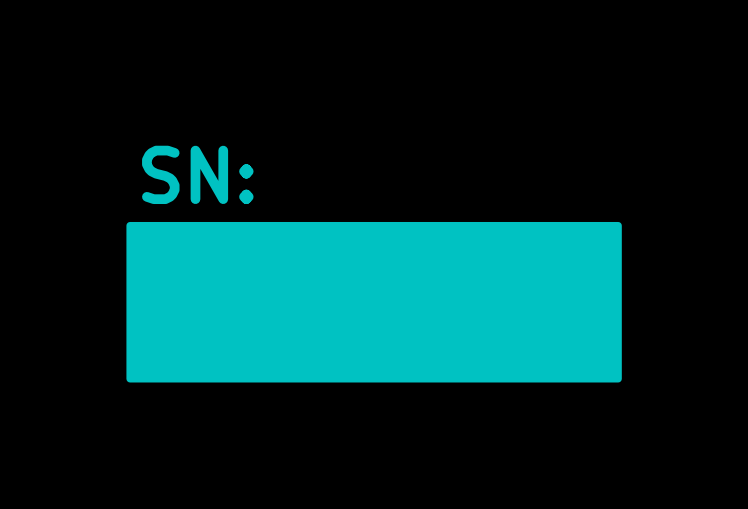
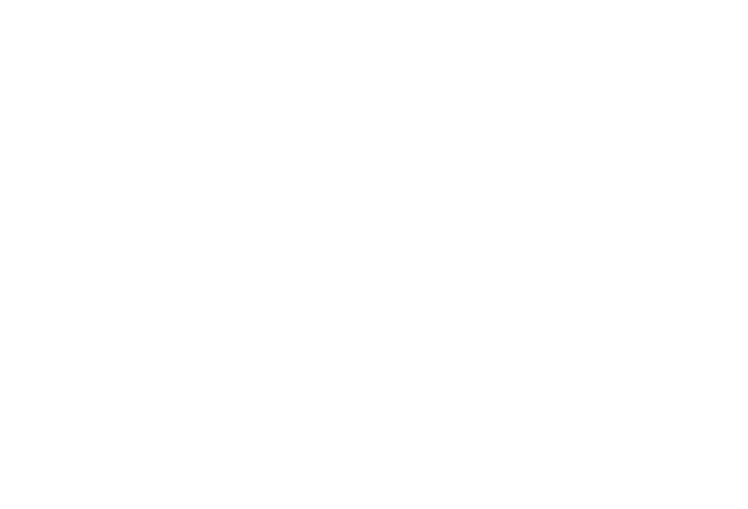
text: SN: (197, 174) -> none
drawing: [126, 221, 622, 383] -> none

